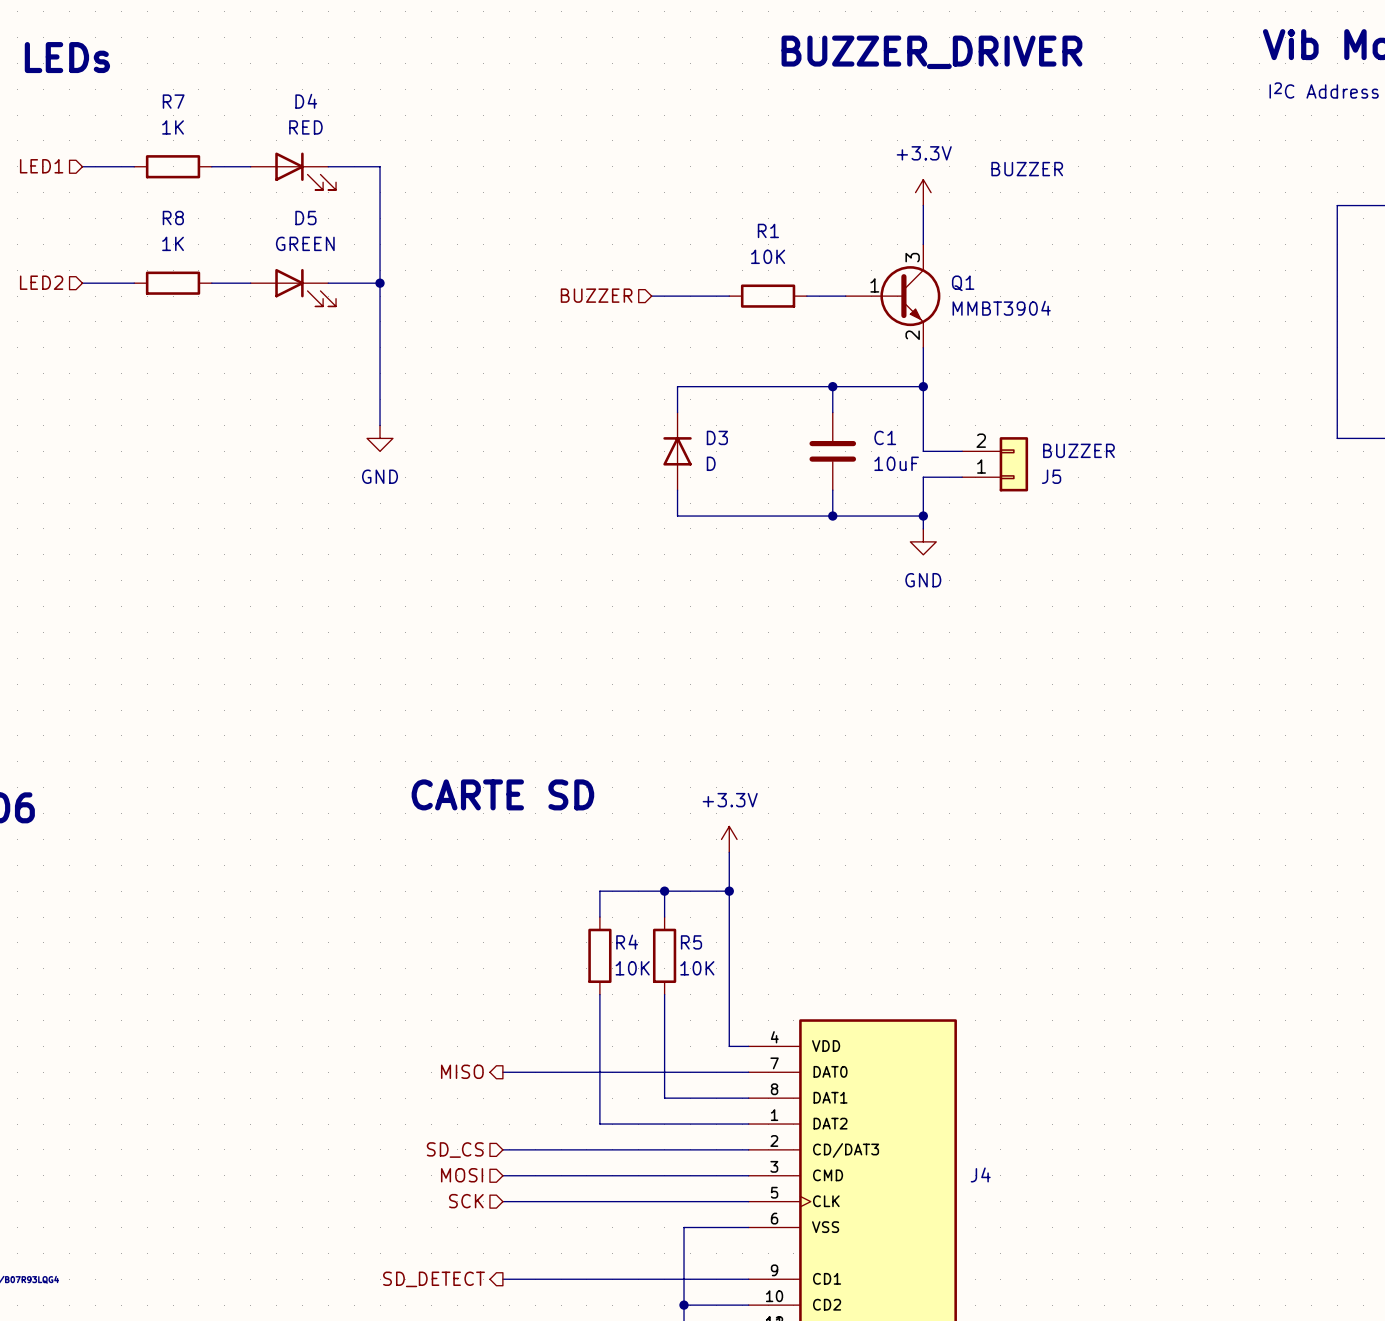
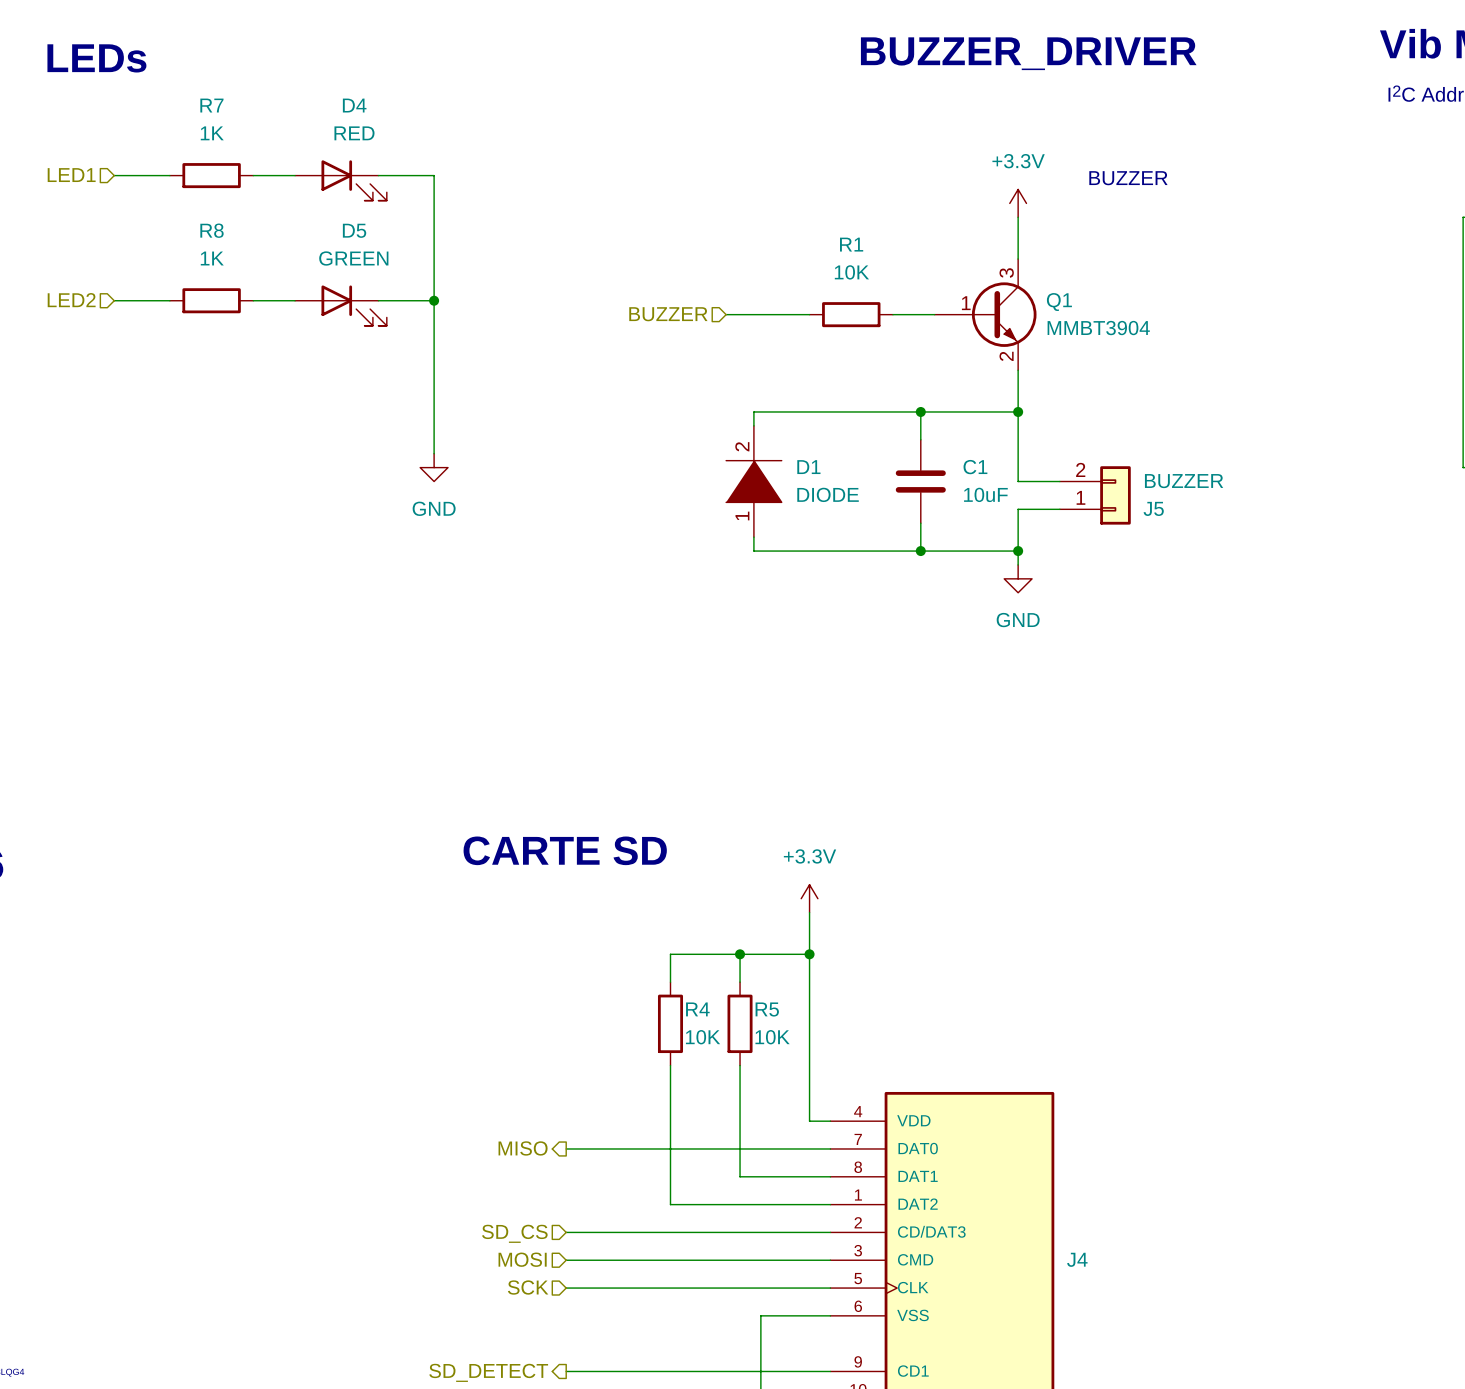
D3: D (677, 451) -> none
D1: none -> DIODE (753, 481)

